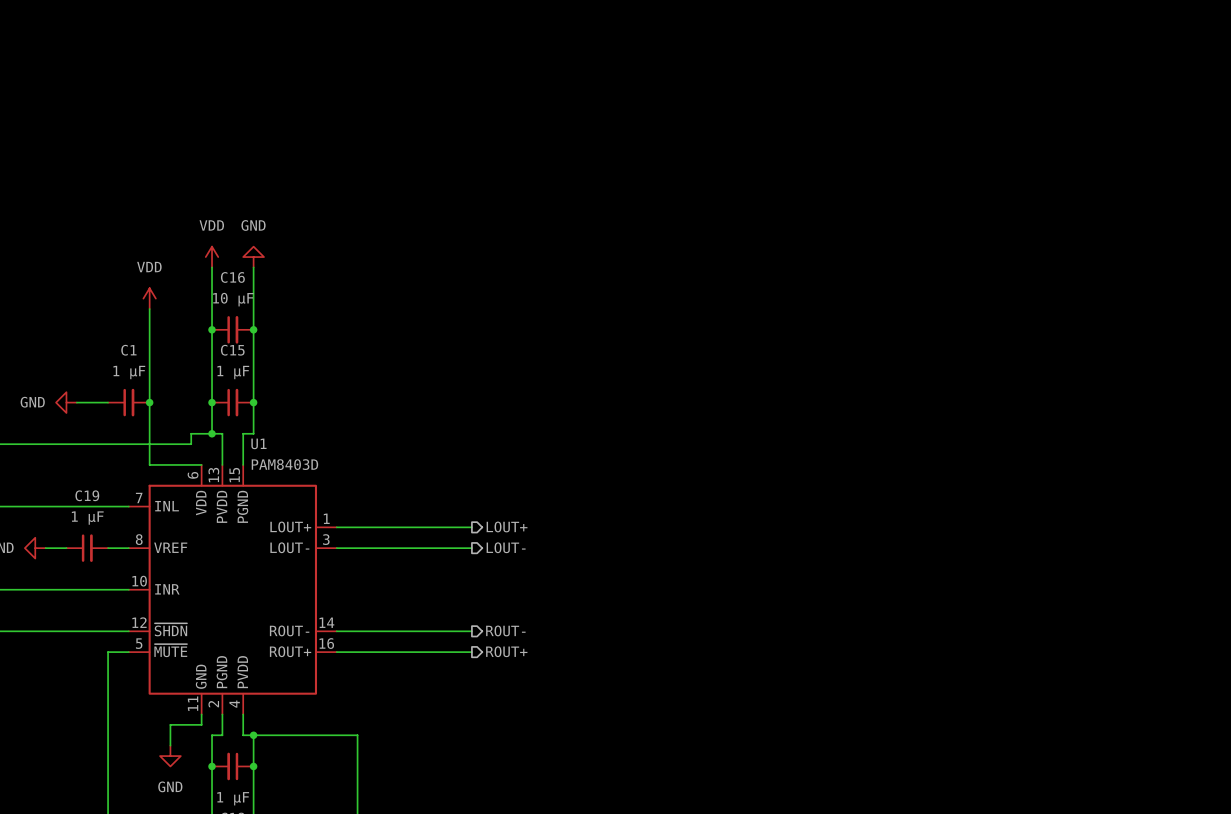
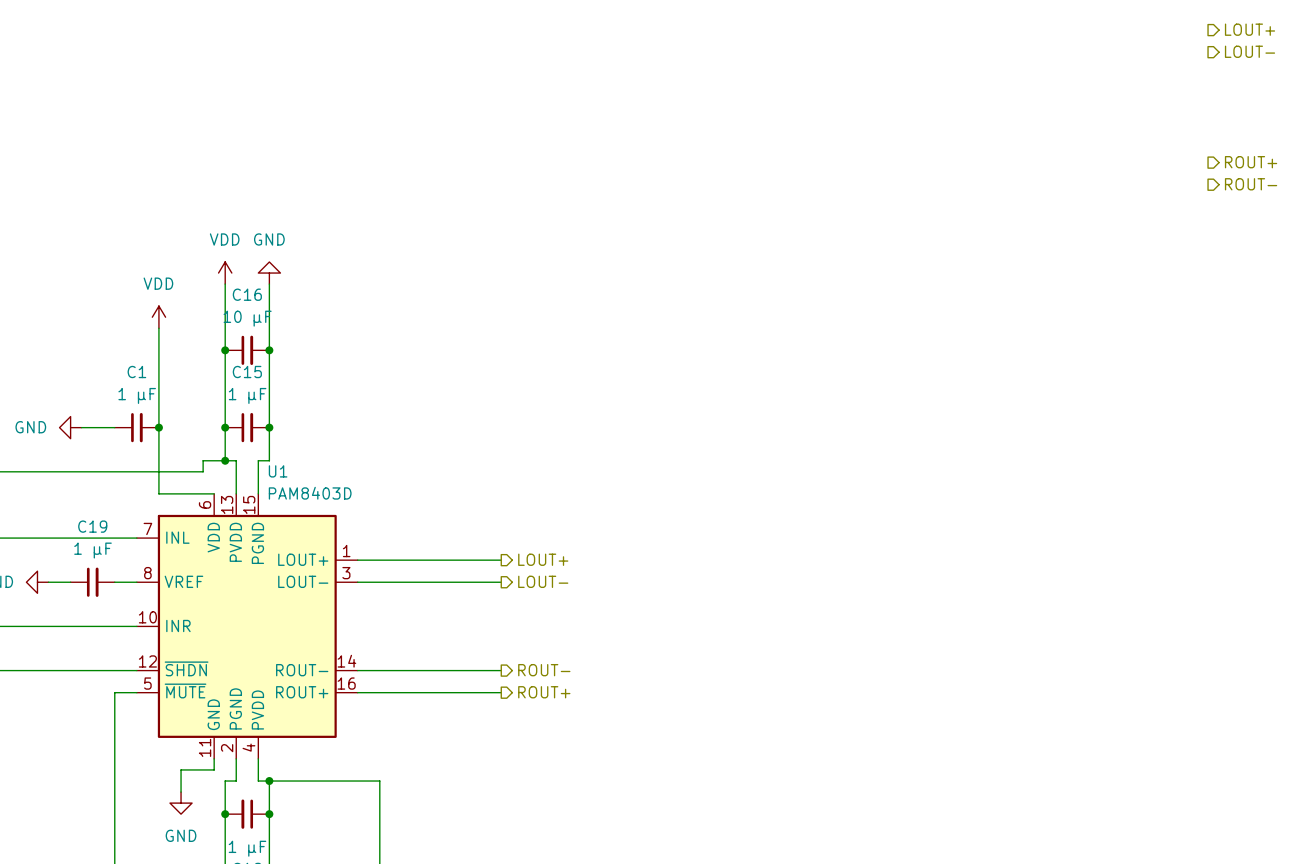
hierarchical label: none -> LOUT+ (1250, 29)
hierarchical label: none -> LOUT- (1250, 51)
hierarchical label: none -> ROUT+ (1251, 162)
hierarchical label: none -> ROUT- (1251, 184)

